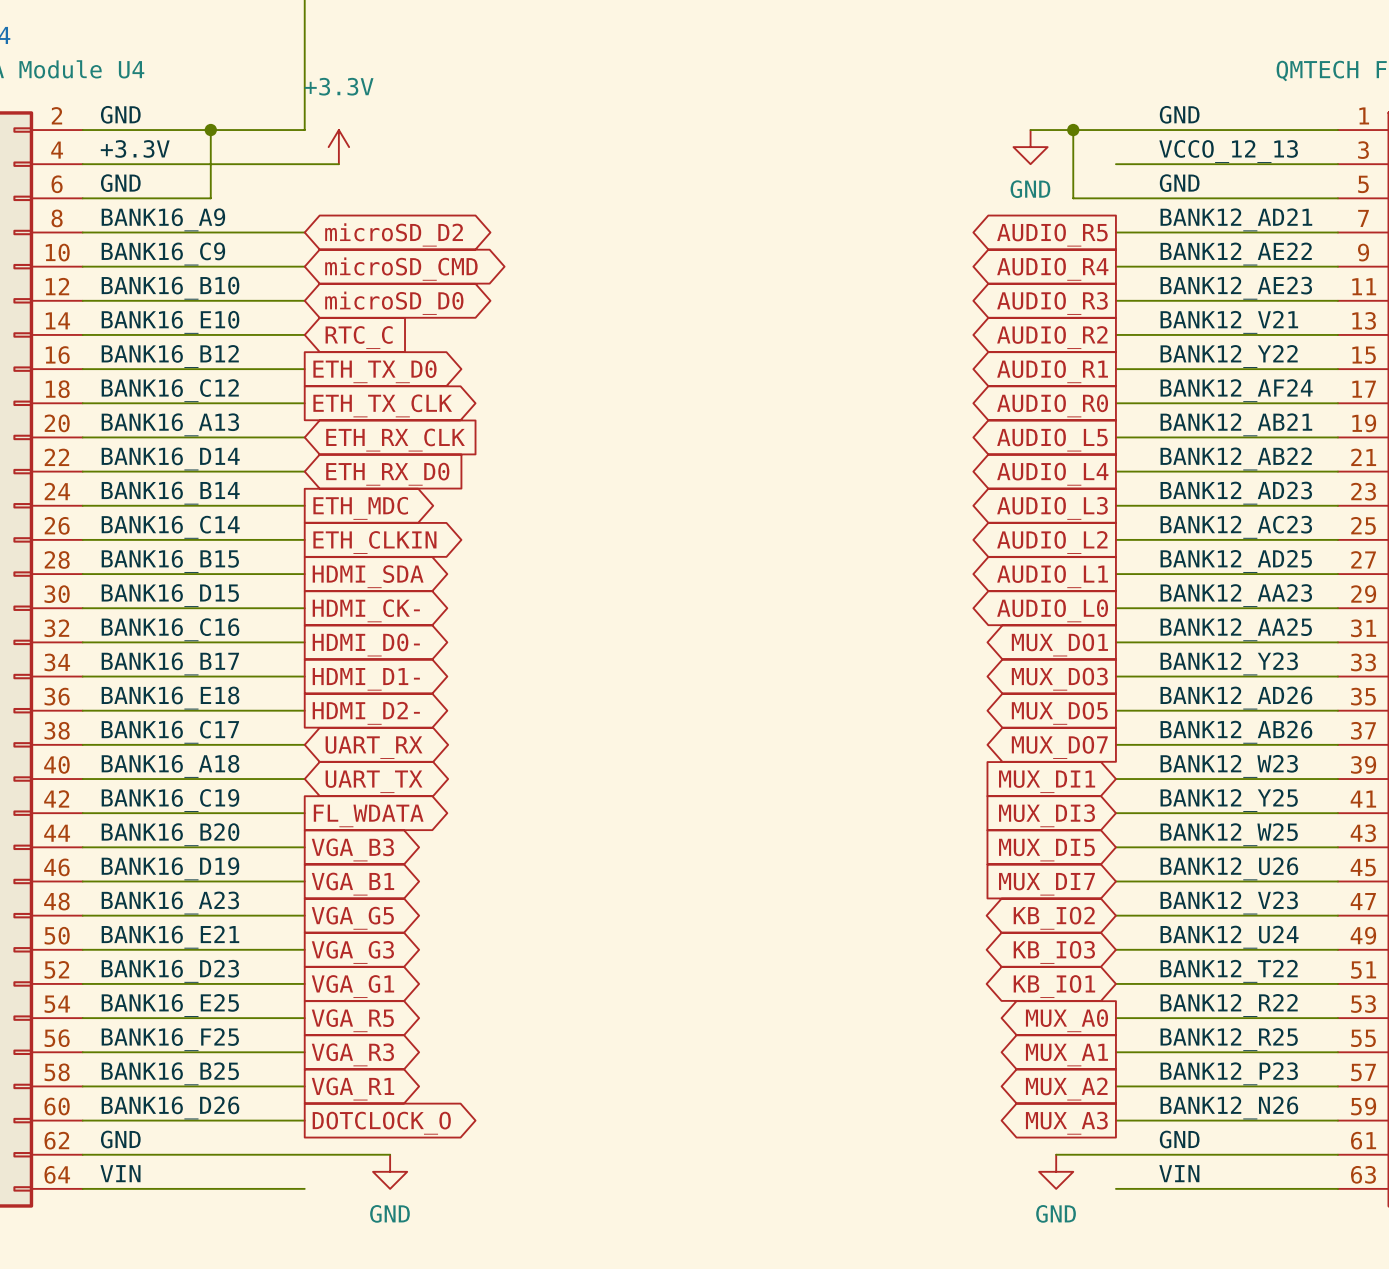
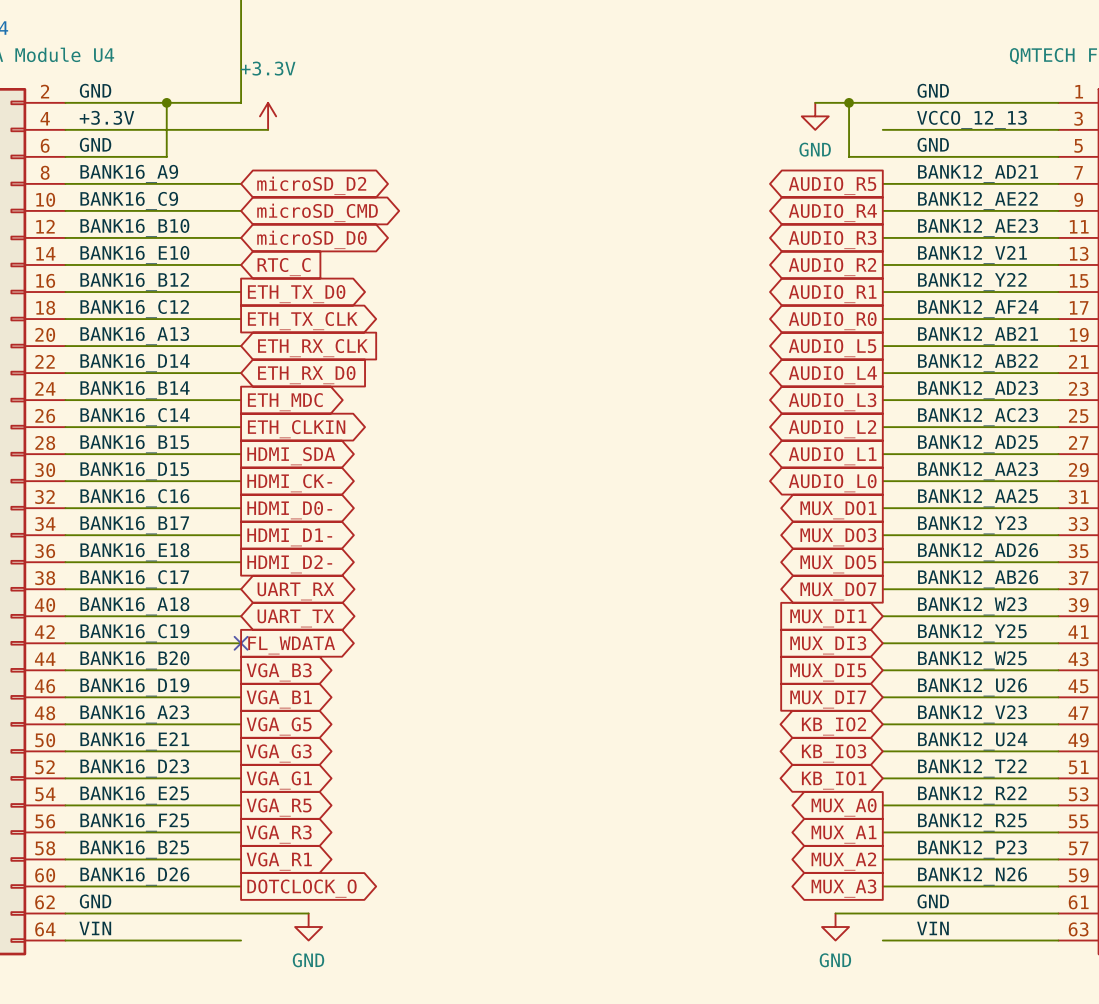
no-connect mark: none -> (241, 643)

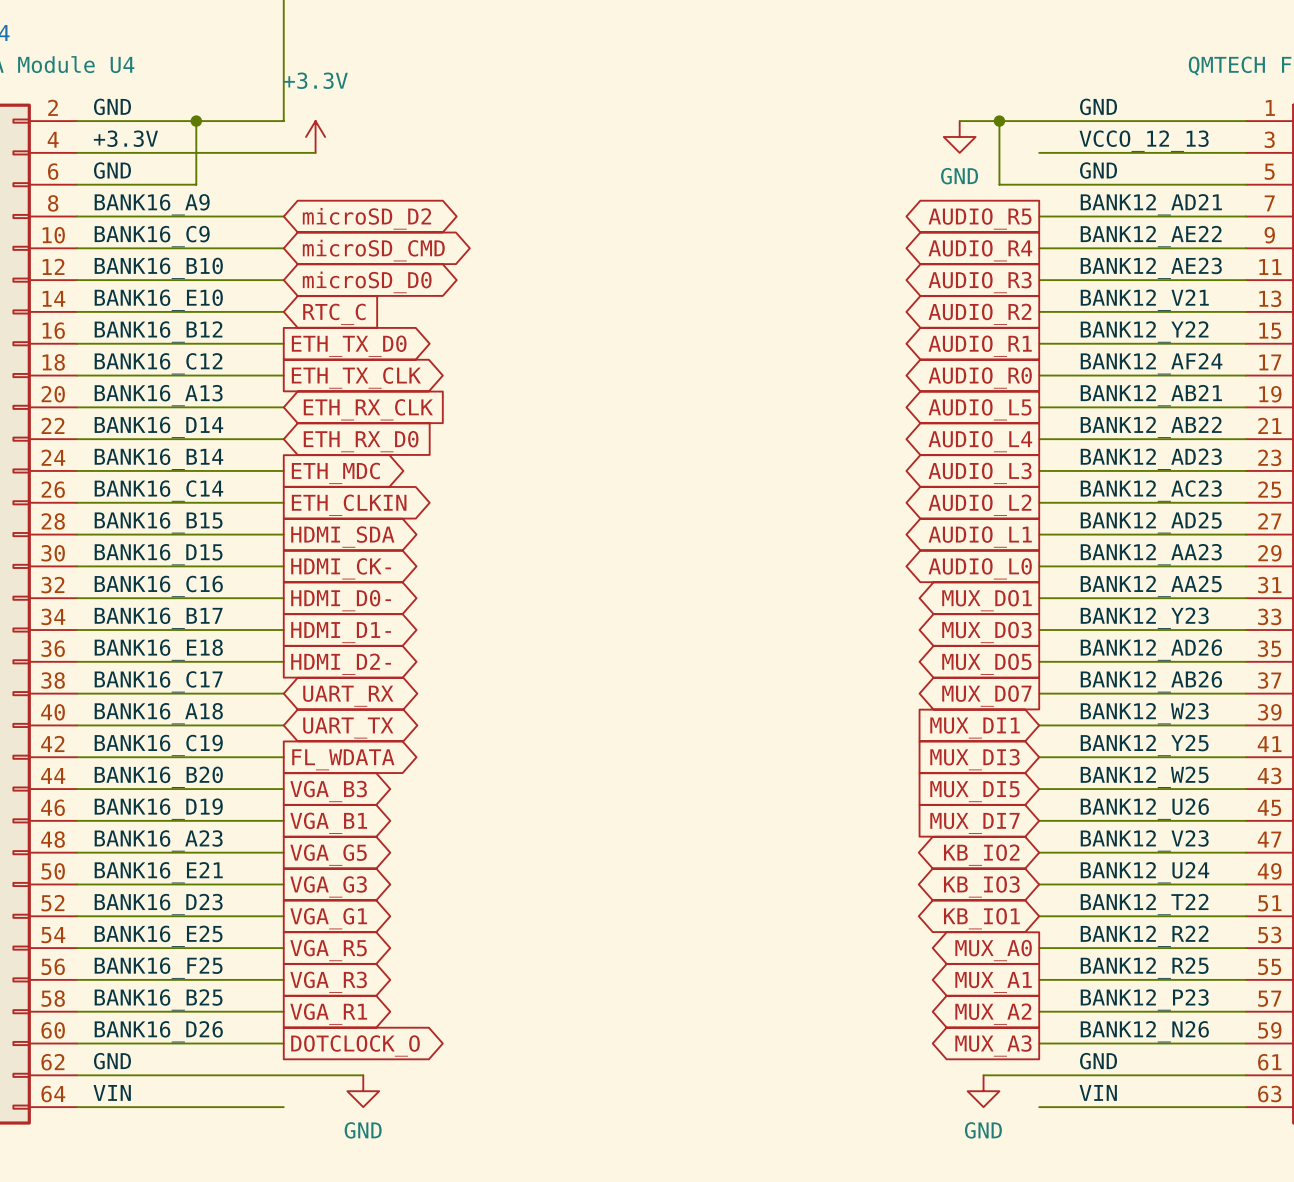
no-connect mark: (241, 643) -> none

